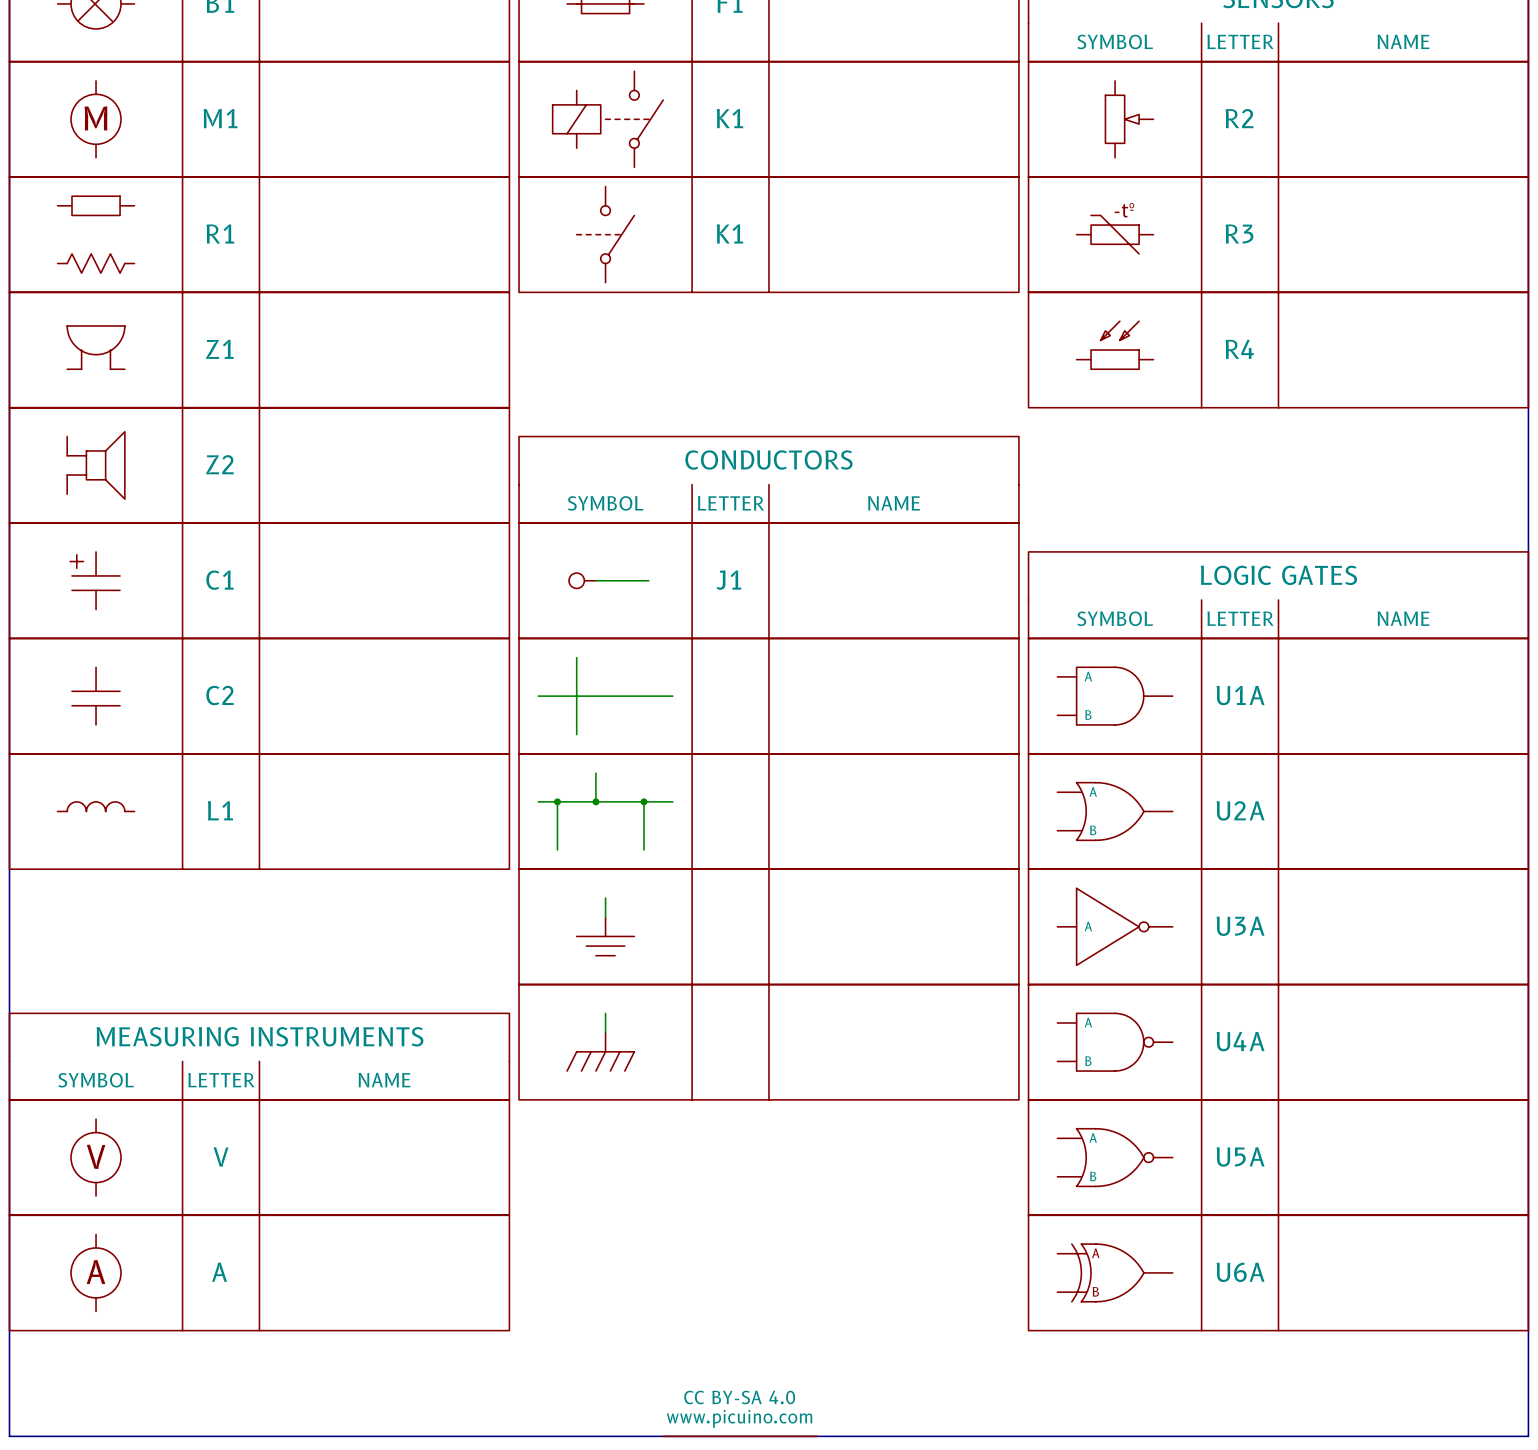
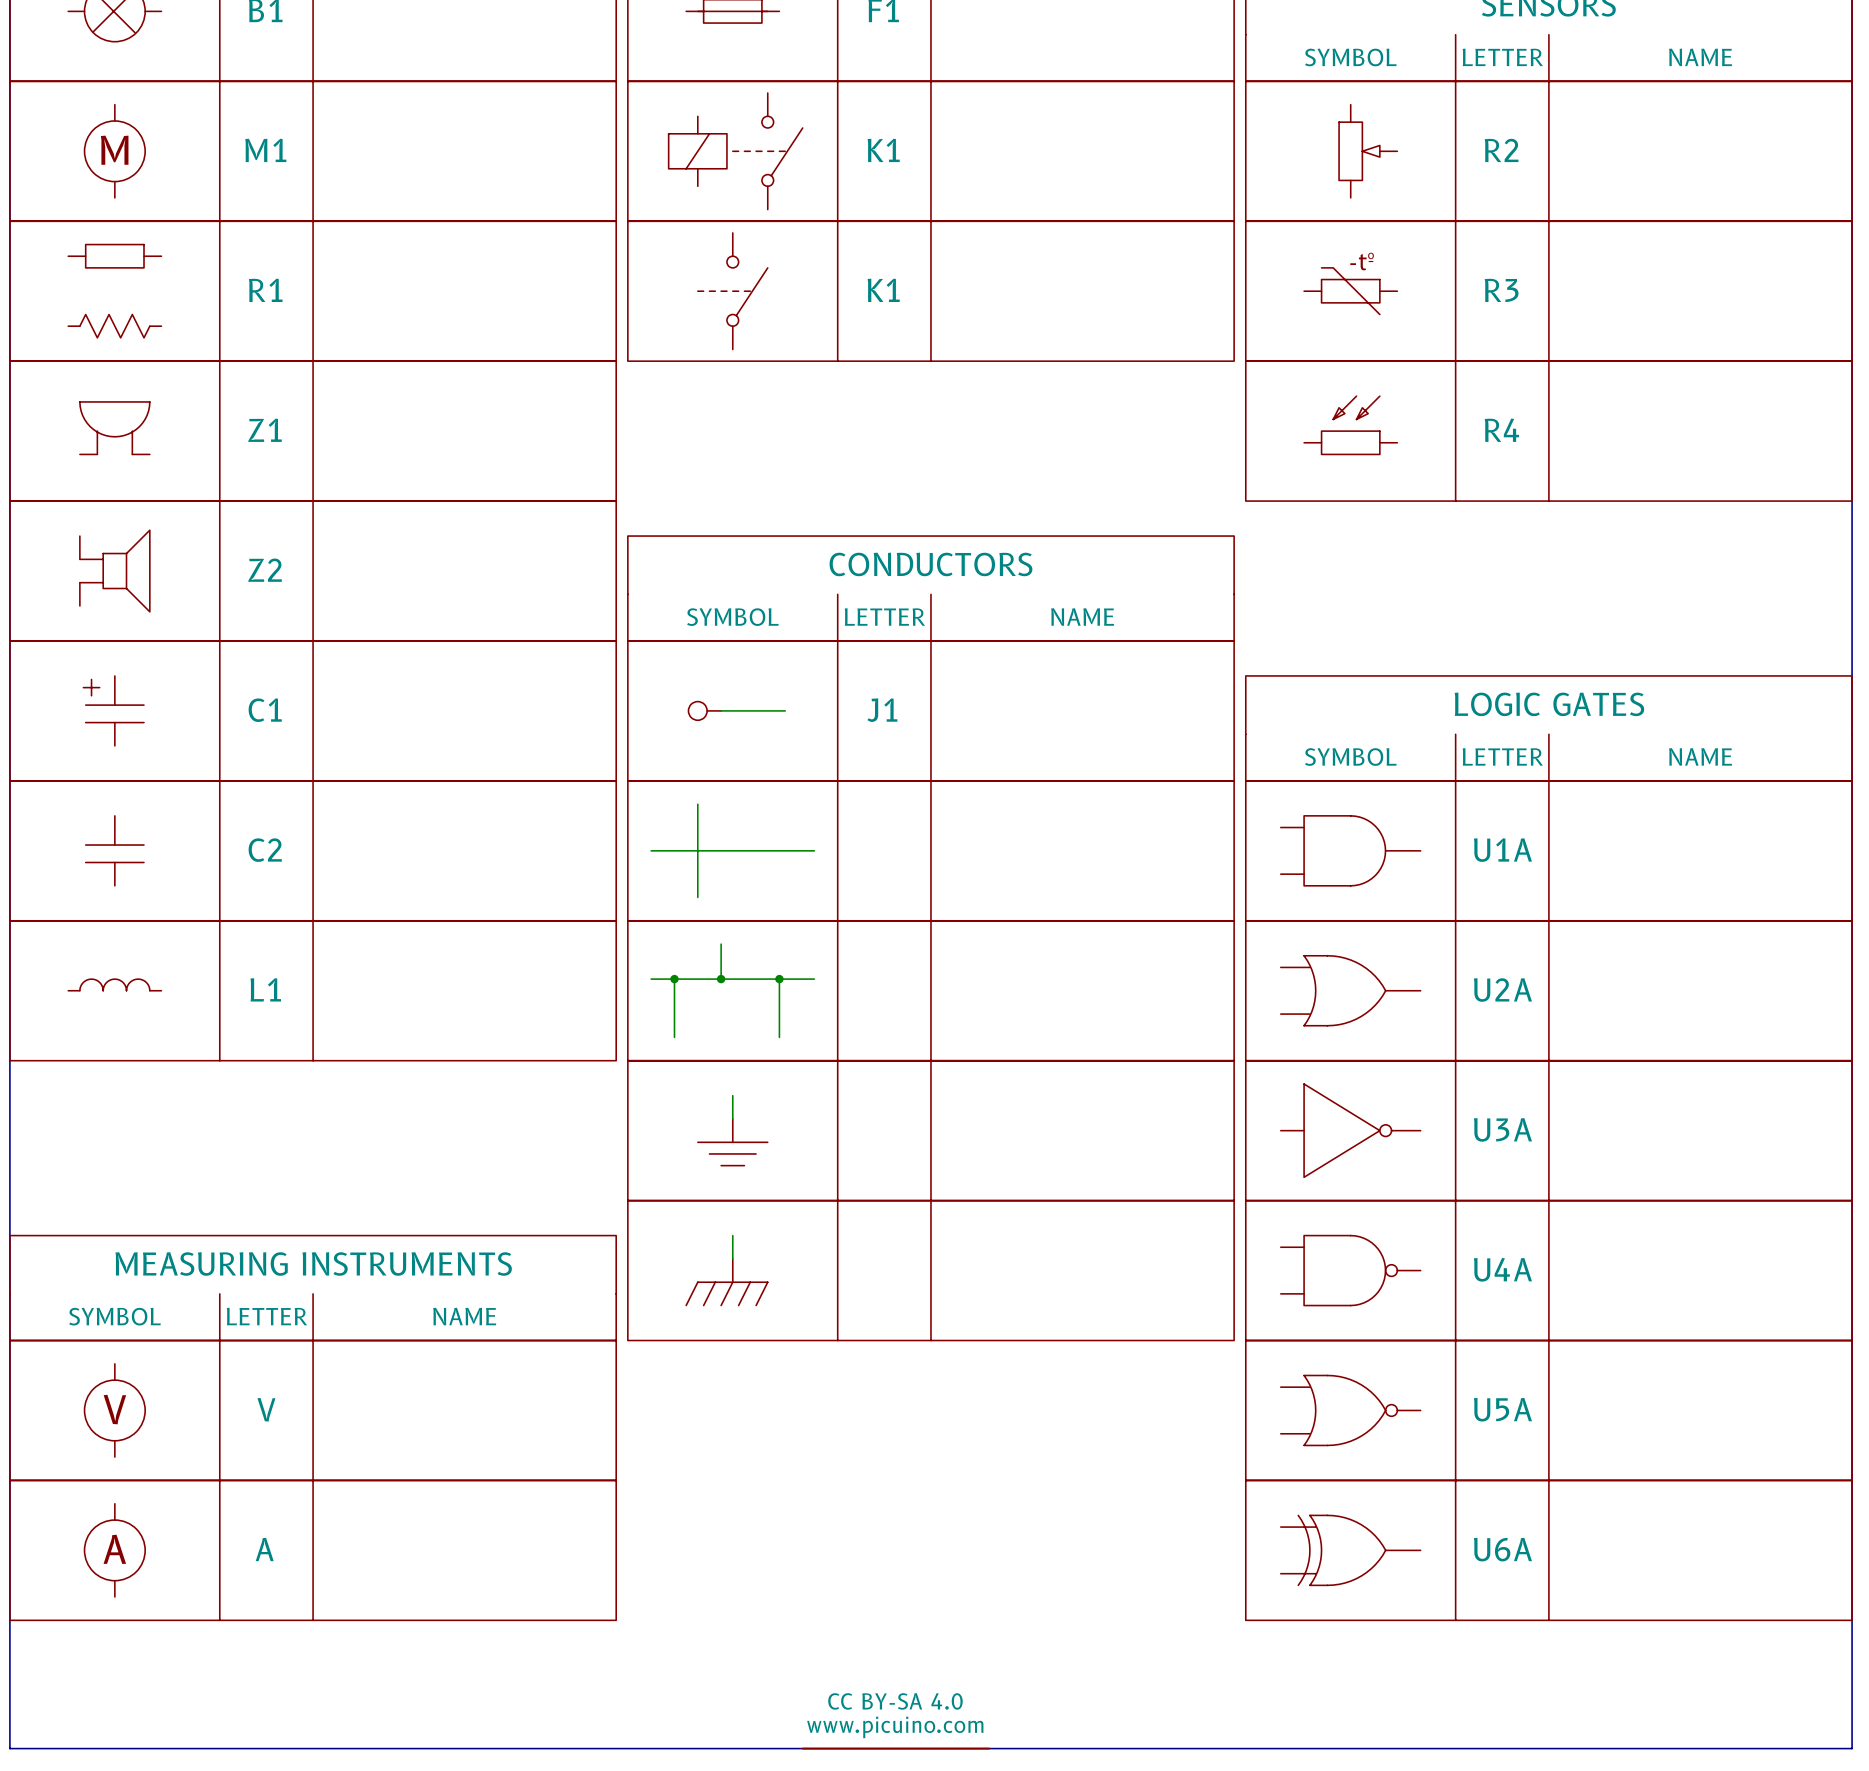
U1A pin name: A (1088, 676) -> none
U1A pin name: B (1088, 715) -> none
U2A pin name: A (1093, 791) -> none
U2A pin name: B (1093, 830) -> none
U3A pin name: A (1088, 926) -> none
U4A pin name: A (1088, 1022) -> none
U4A pin name: B (1088, 1061) -> none
U5A pin name: A (1093, 1137) -> none
U5A pin name: B (1093, 1176) -> none
U6A text: A (1095, 1253) -> none
U6A text: B (1095, 1291) -> none

